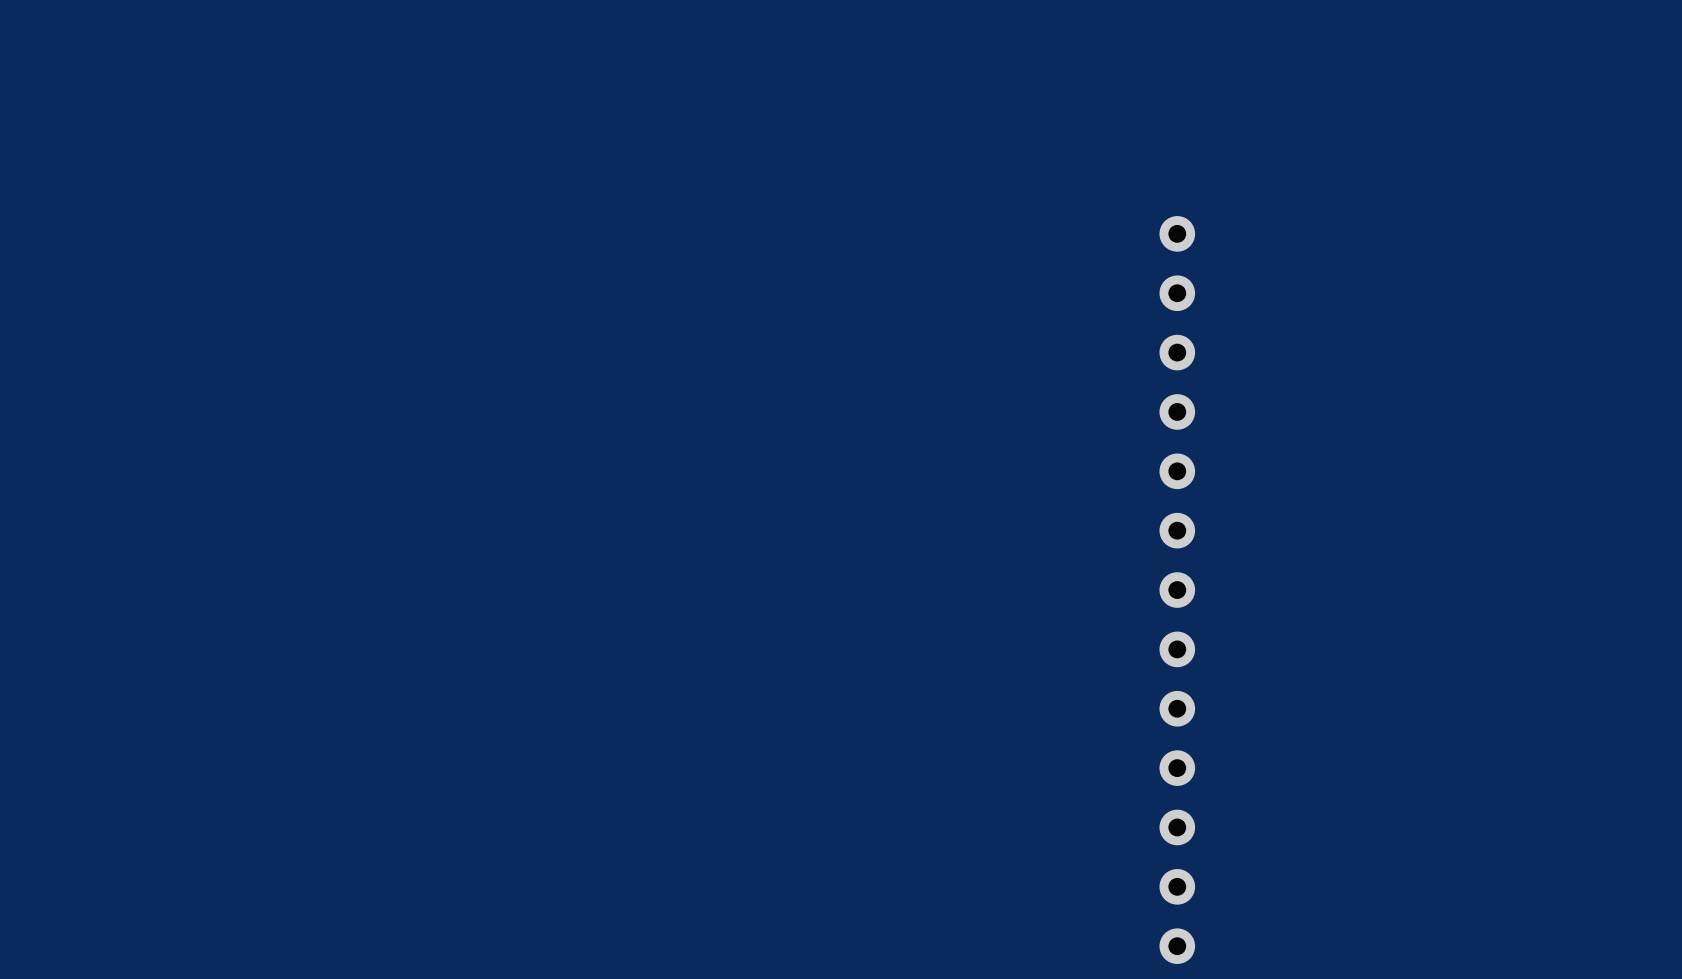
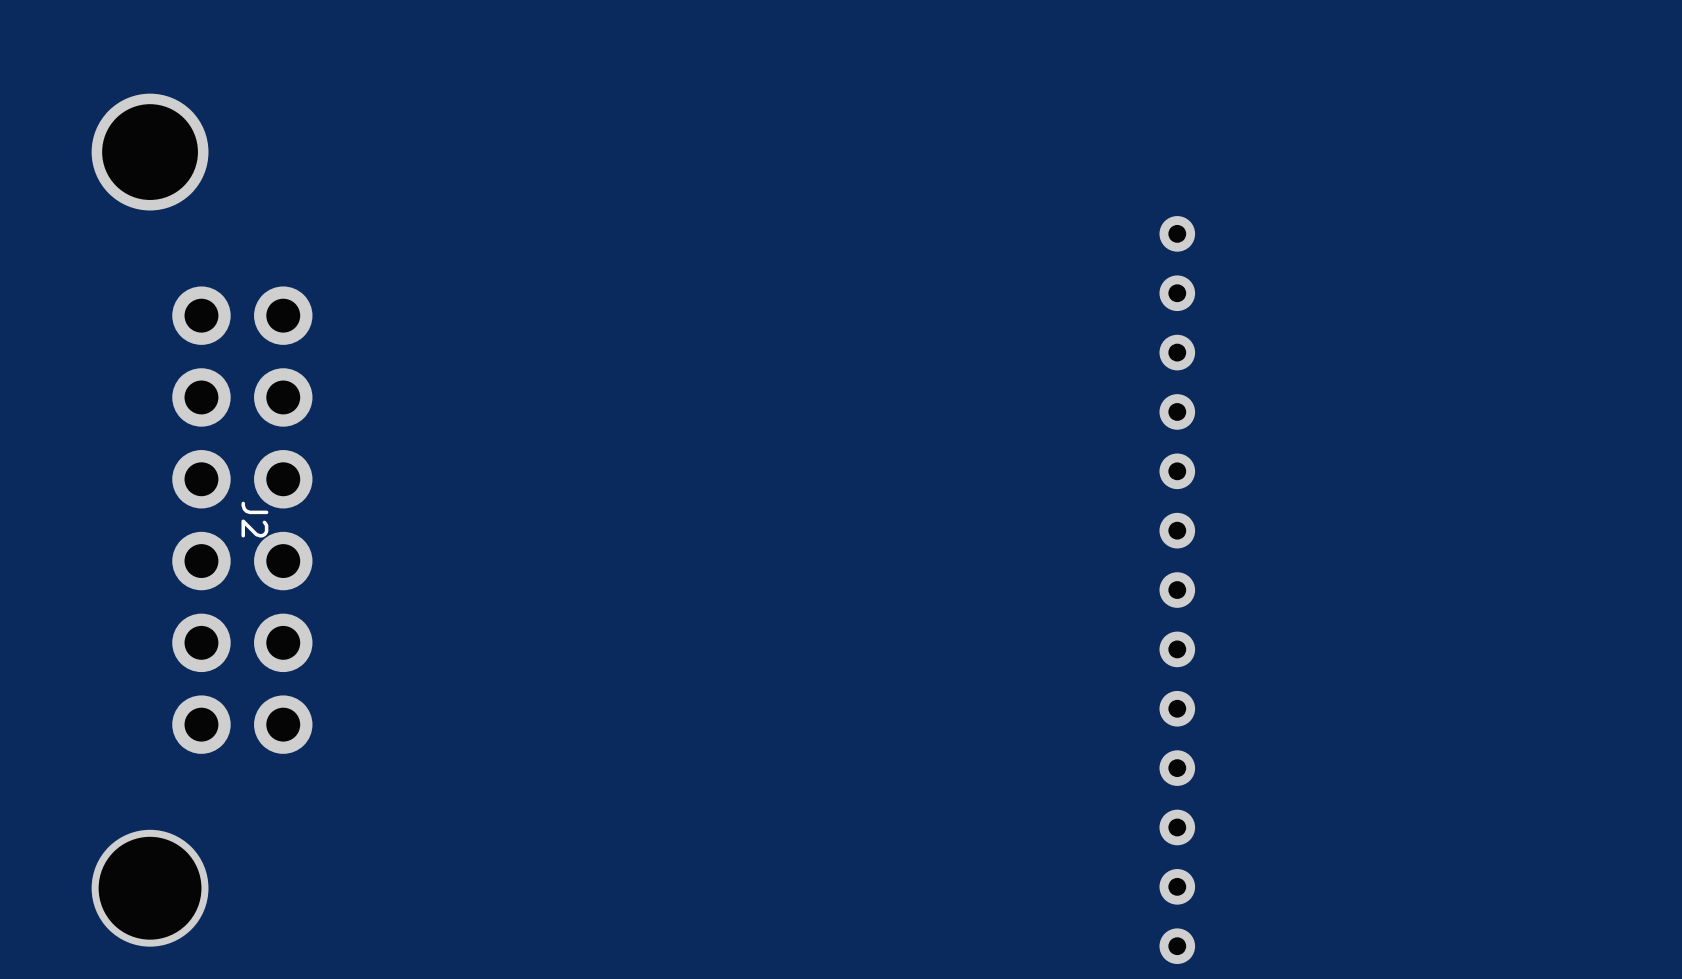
J2: none -> (202, 520)

